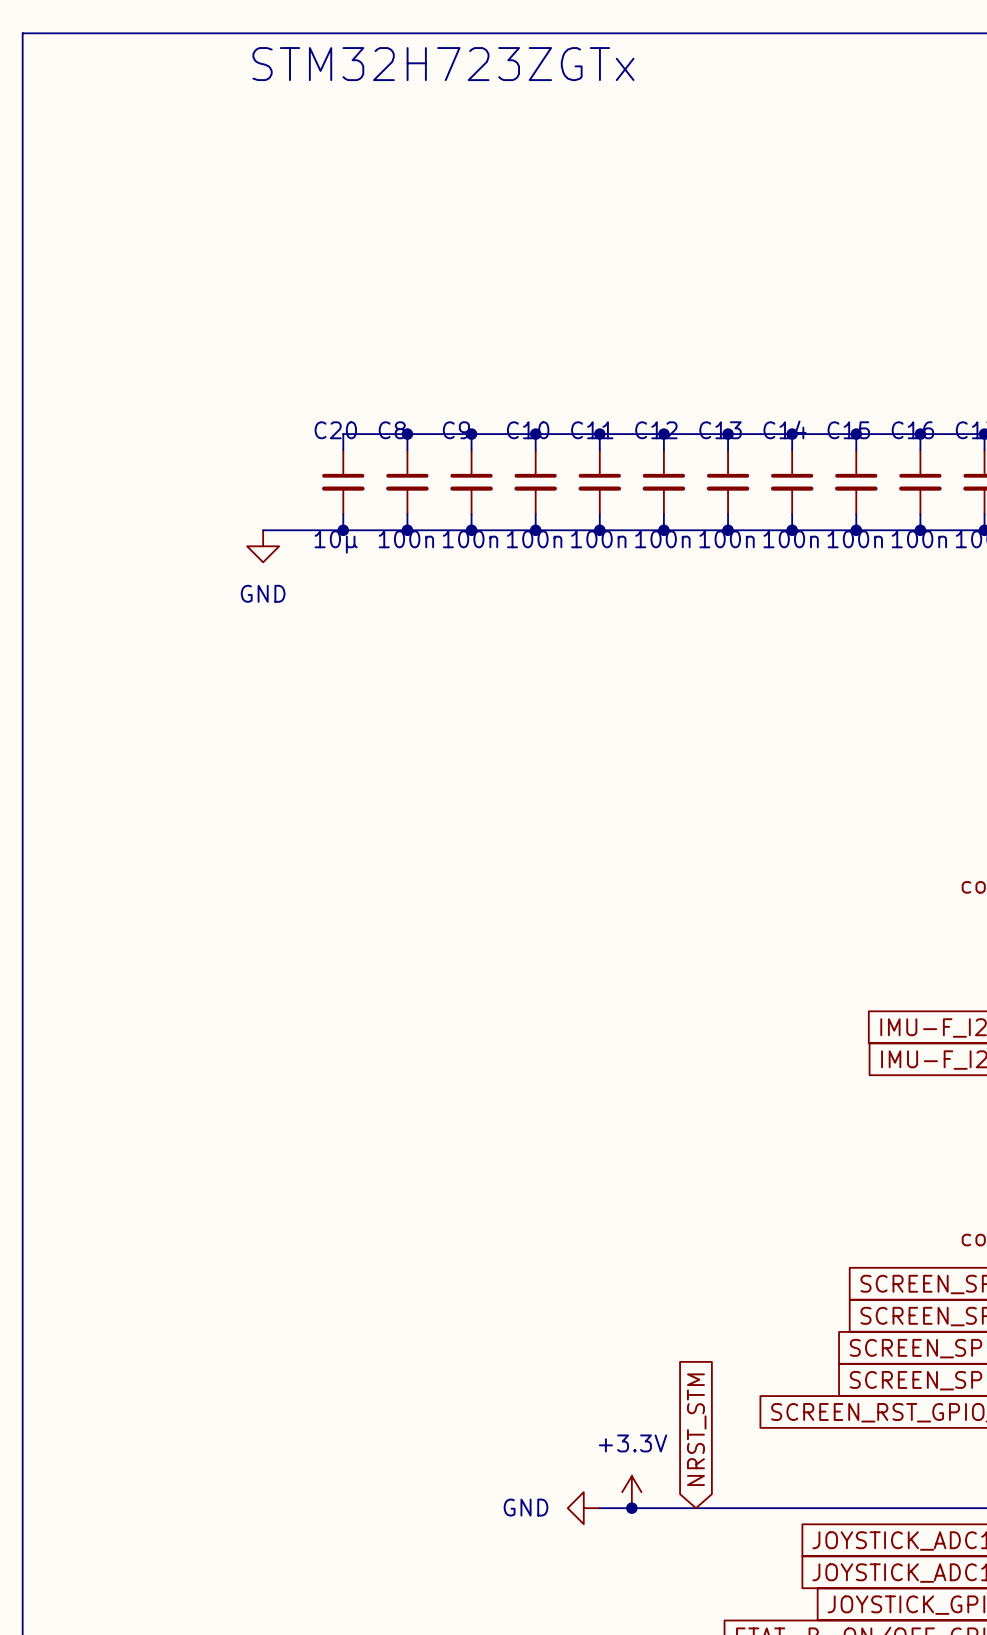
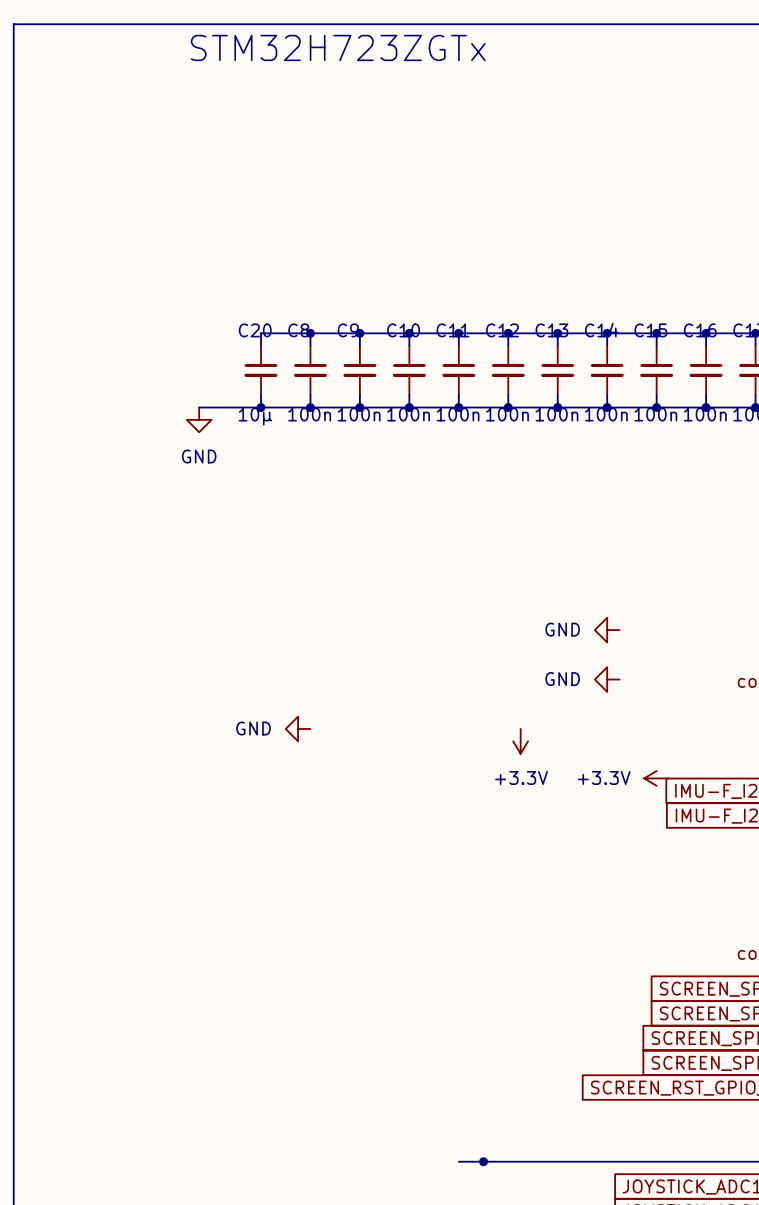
power symbol: none -> GND (607, 630)
power symbol: none -> GND (607, 679)
power symbol: none -> GND (298, 728)
power symbol: none -> +3.3V (520, 741)
power symbol: none -> +3.3V (656, 778)
global label: NRST_STM (696, 1429) -> none
power symbol: +3.3V (631, 1492) -> none
power symbol: GND (583, 1508) -> none

